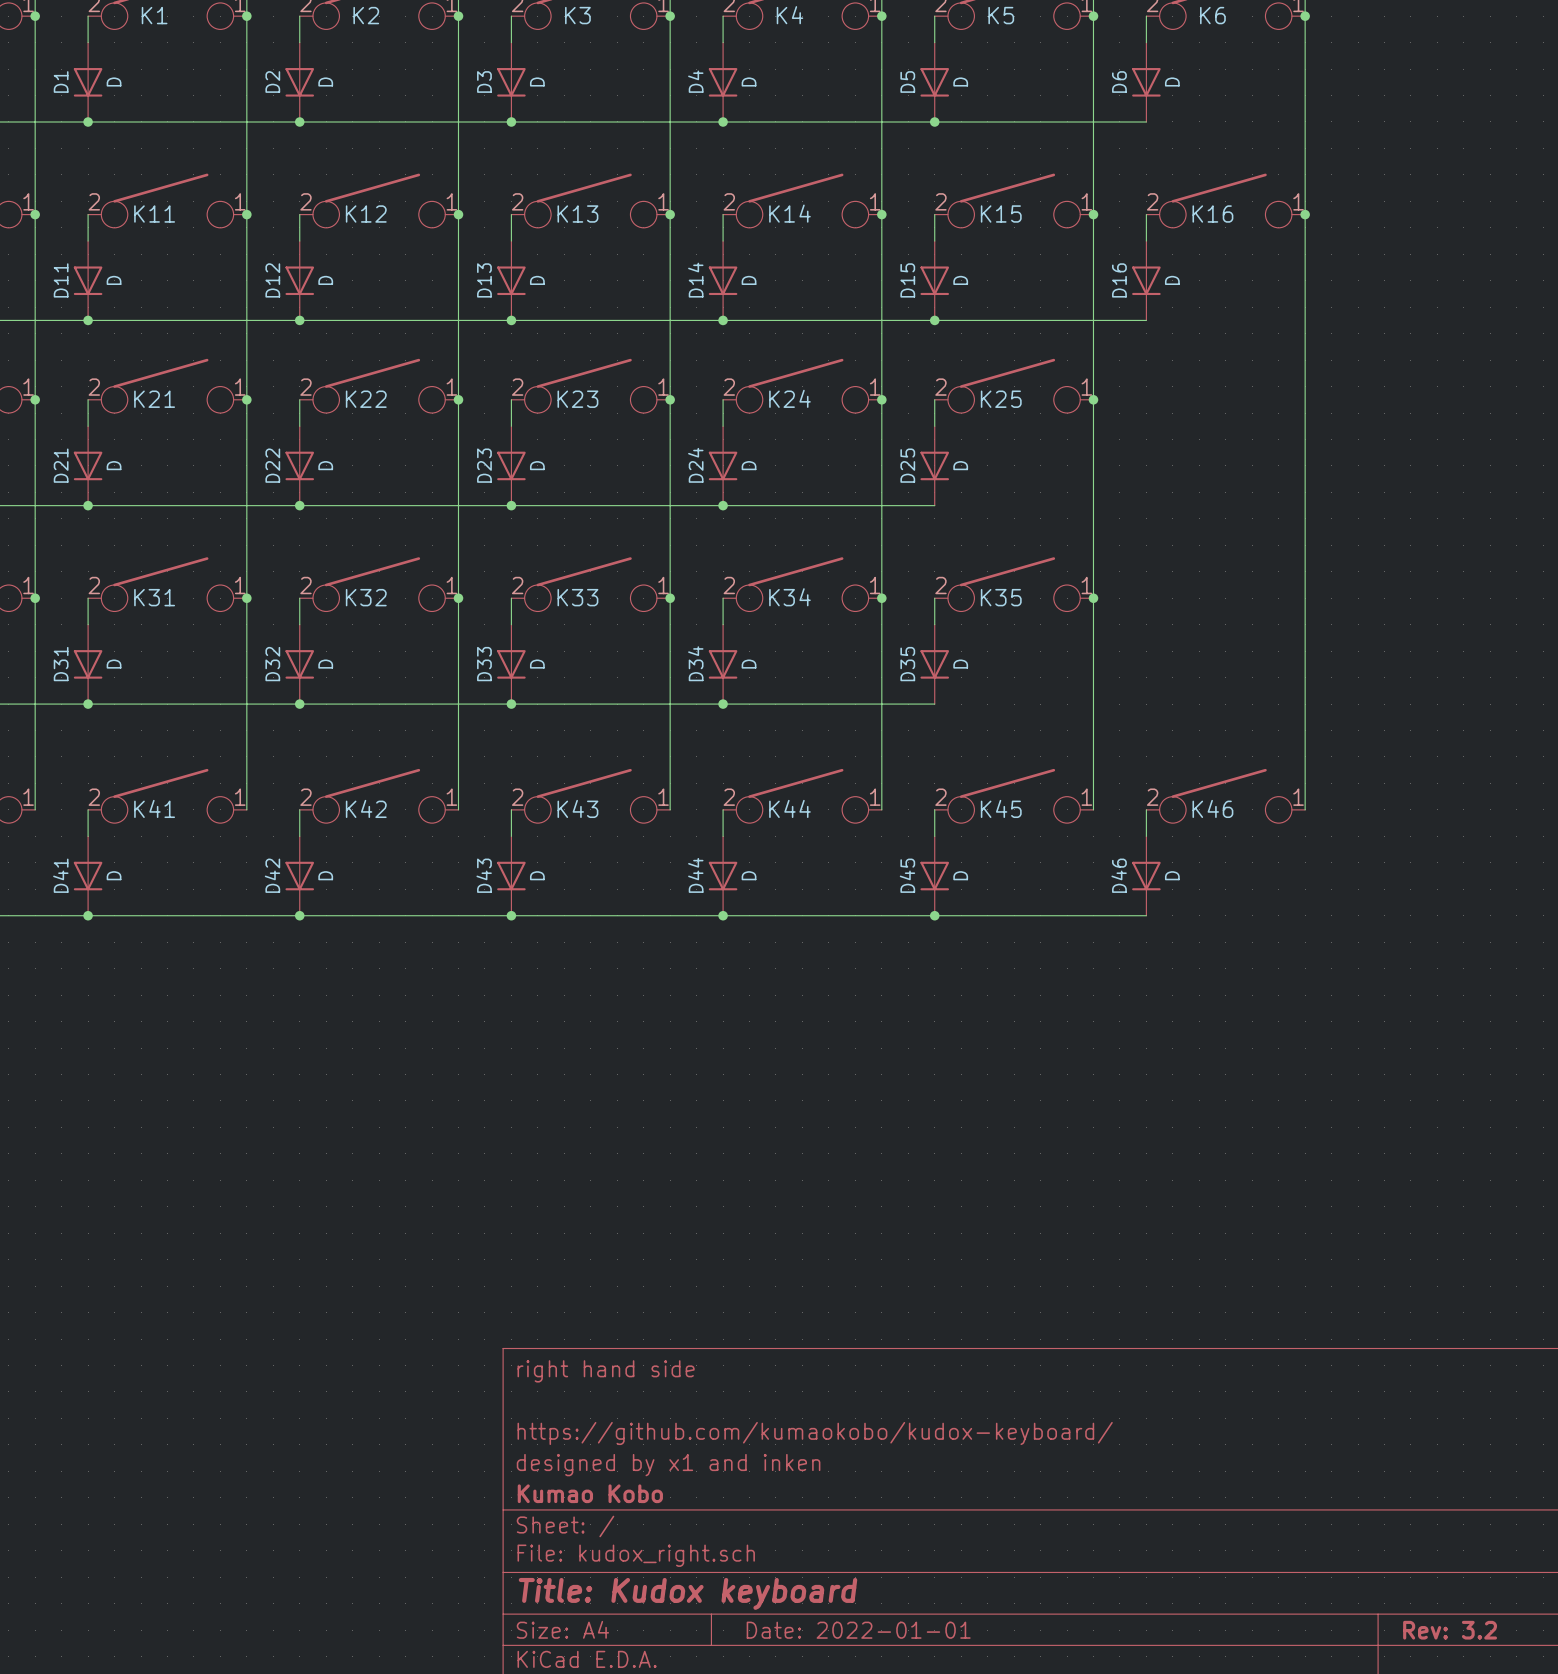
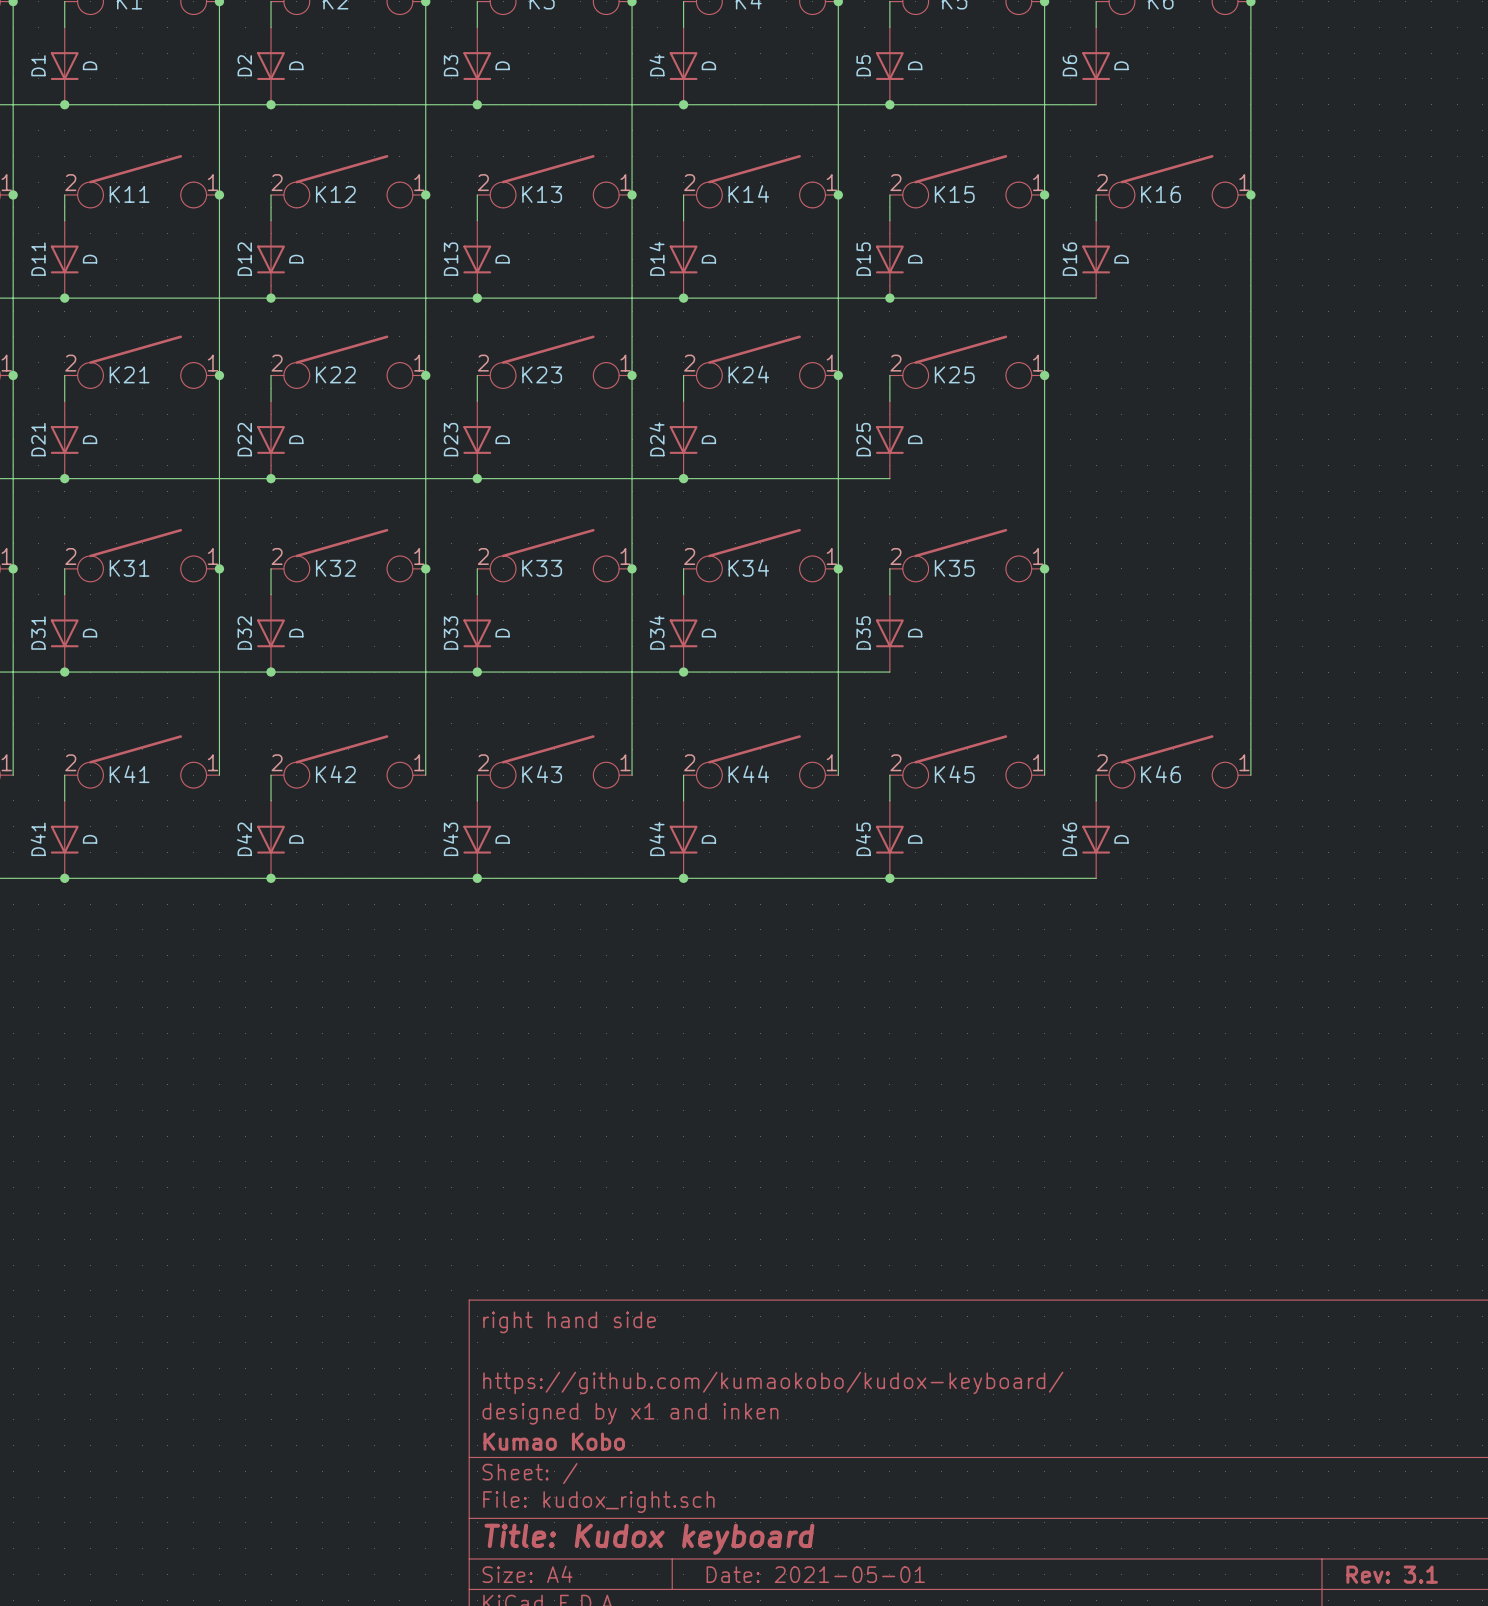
title block: Date: 2022-01-01 (858, 1630) -> Date: 2021-05-01 (815, 1574)
title block: Rev: 3.2 (1450, 1630) -> Rev: 3.1 (1392, 1574)

